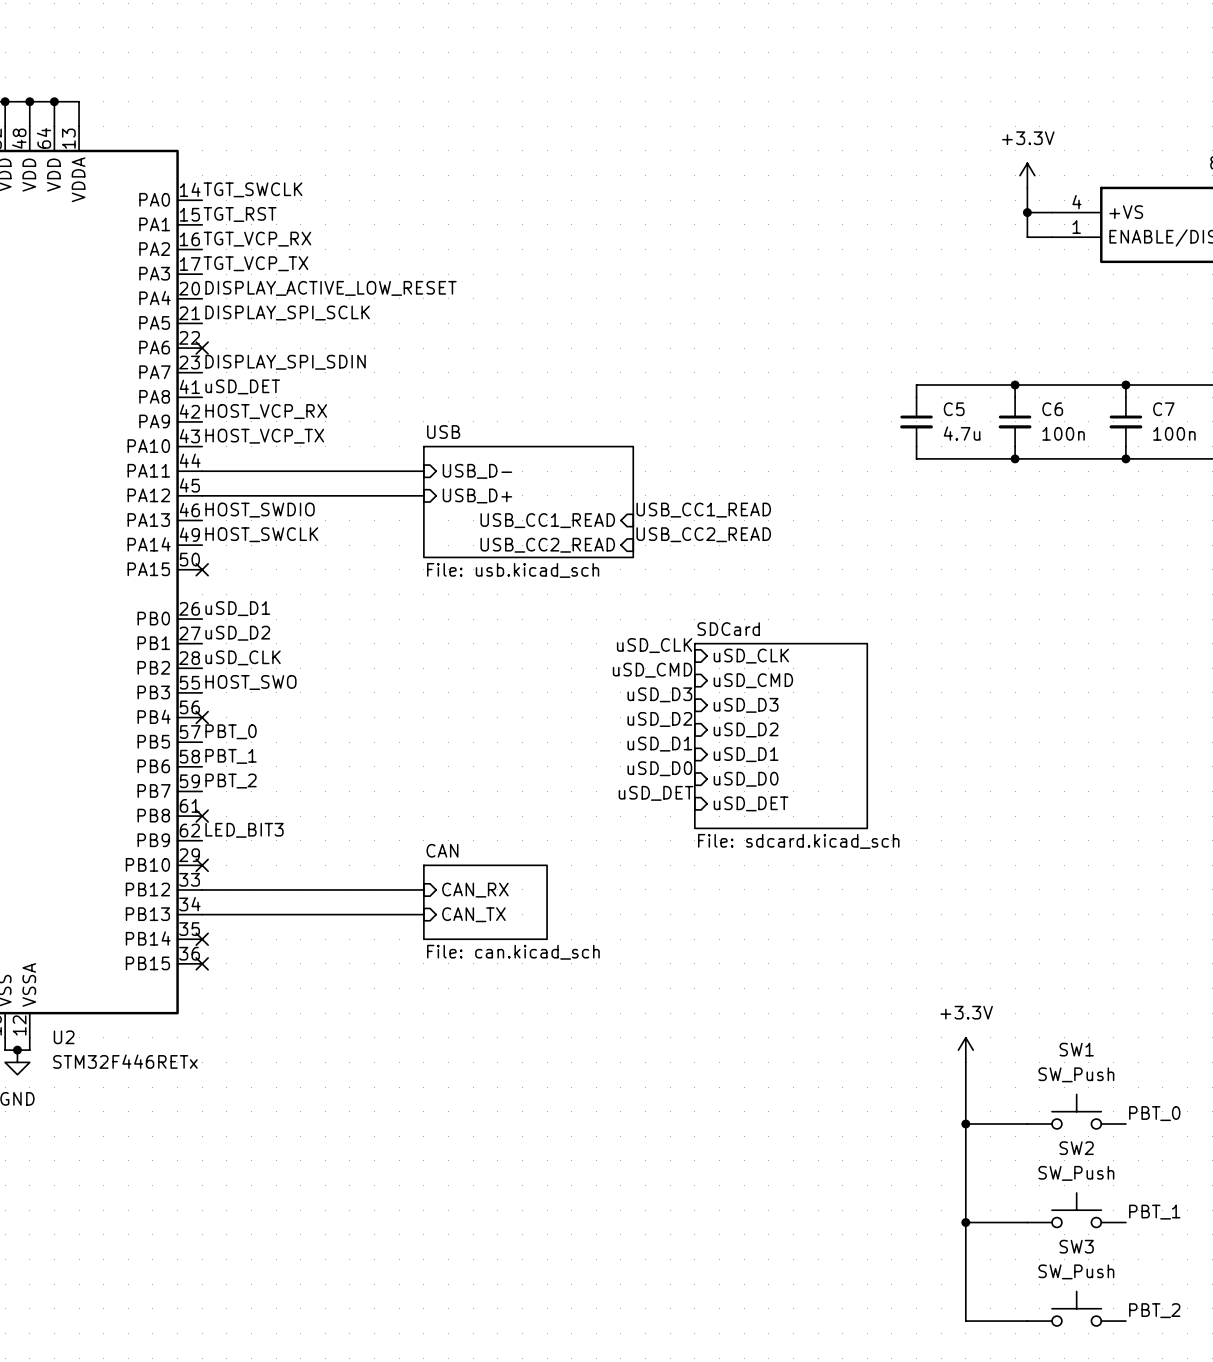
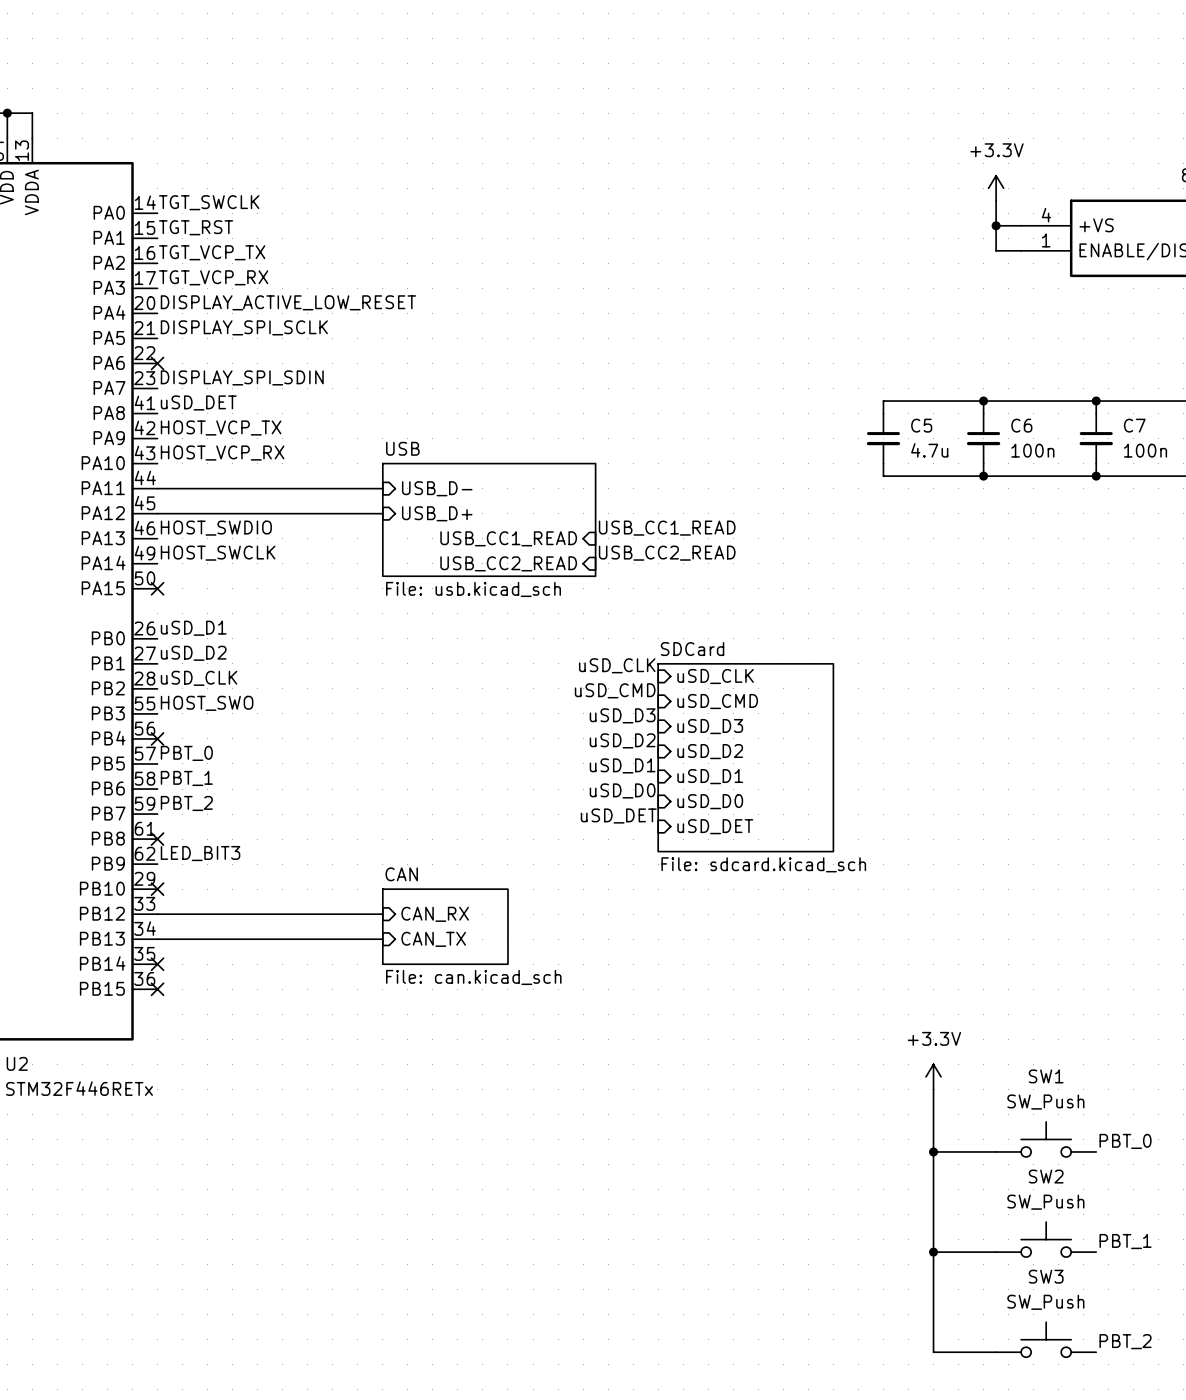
label: TGT_VCP_RX (257, 239) -> TGT_VCP_TX (212, 252)
label: TGT_VCP_TX (255, 263) -> TGT_VCP_RX (213, 277)
label: HOST_VCP_RX (266, 411) -> HOST_VCP_TX (221, 427)
label: HOST_VCP_TX (264, 436) -> HOST_VCP_RX (222, 453)

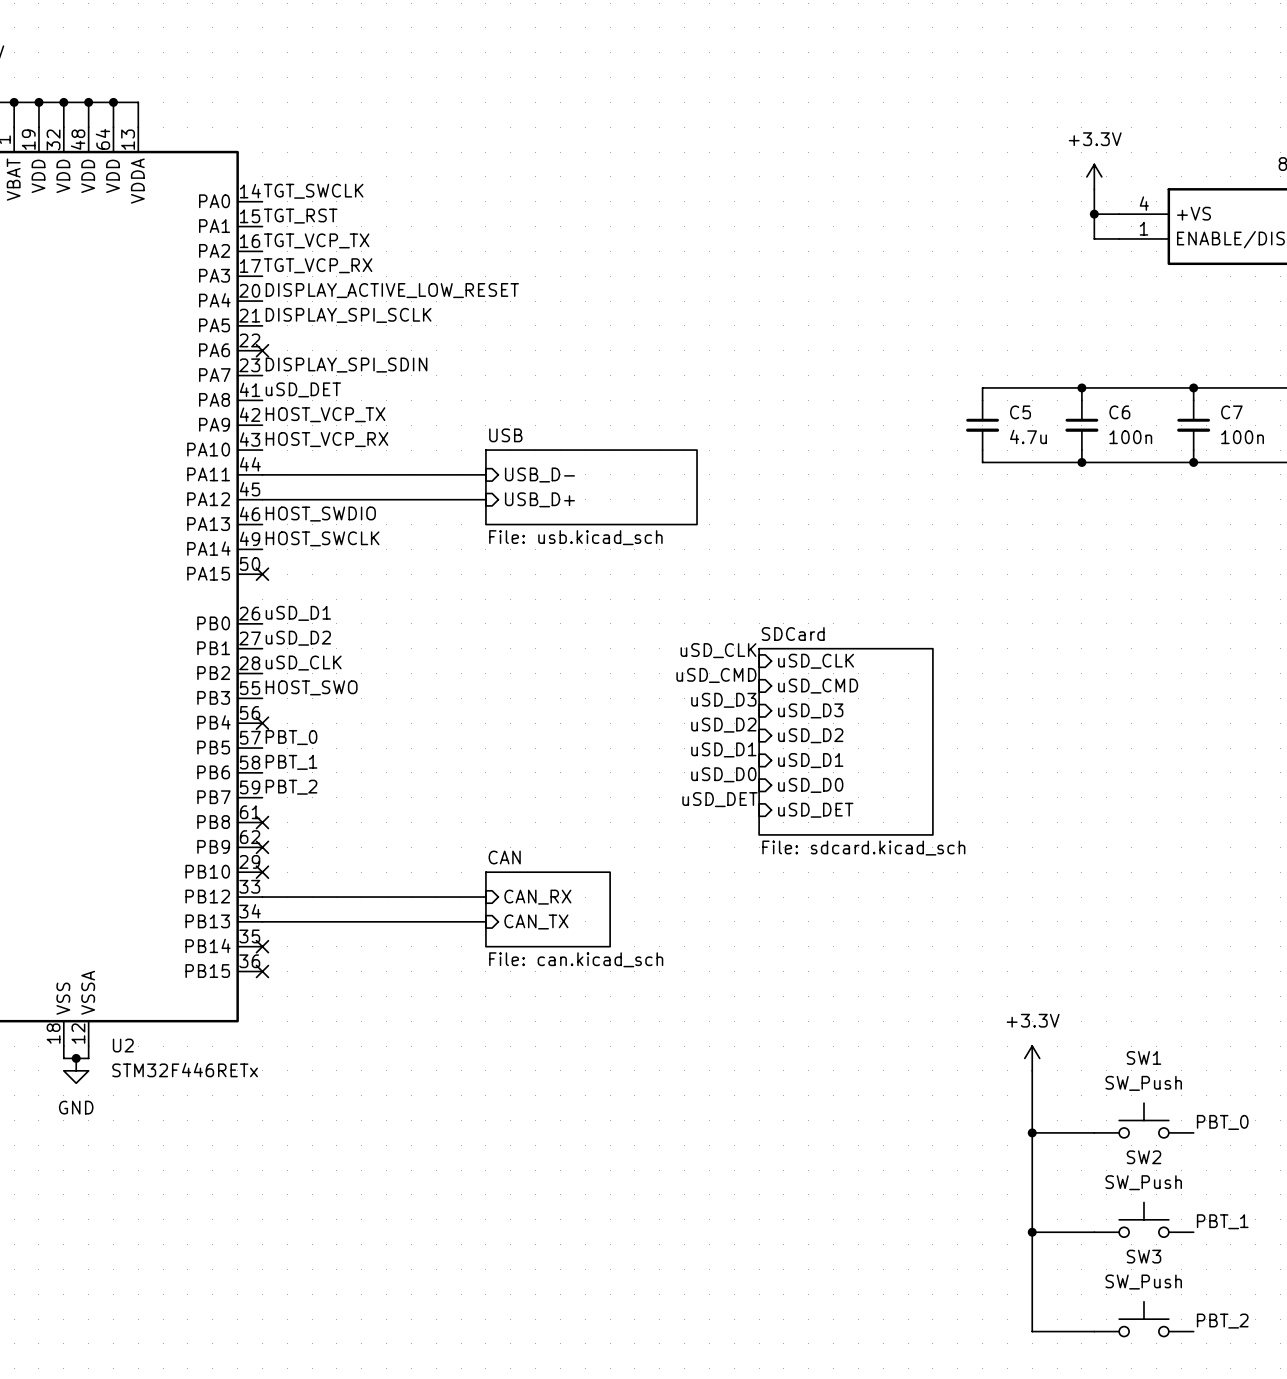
sheet USB: none -> File: usb.kicad_sch (591, 487)
sheet USB: File: usb.kicad_sch (489, 519) -> none
label: USB_CC1_READ (667, 528) -> none
sheet pin: USB_CC1_READ (508, 538) -> none
label: USB_CC2_READ (667, 553) -> none
sheet pin: USB_CC2_READ (508, 563) -> none
label: LED_BIT3 (200, 853) -> none
no-connect mark: none -> (262, 847)

